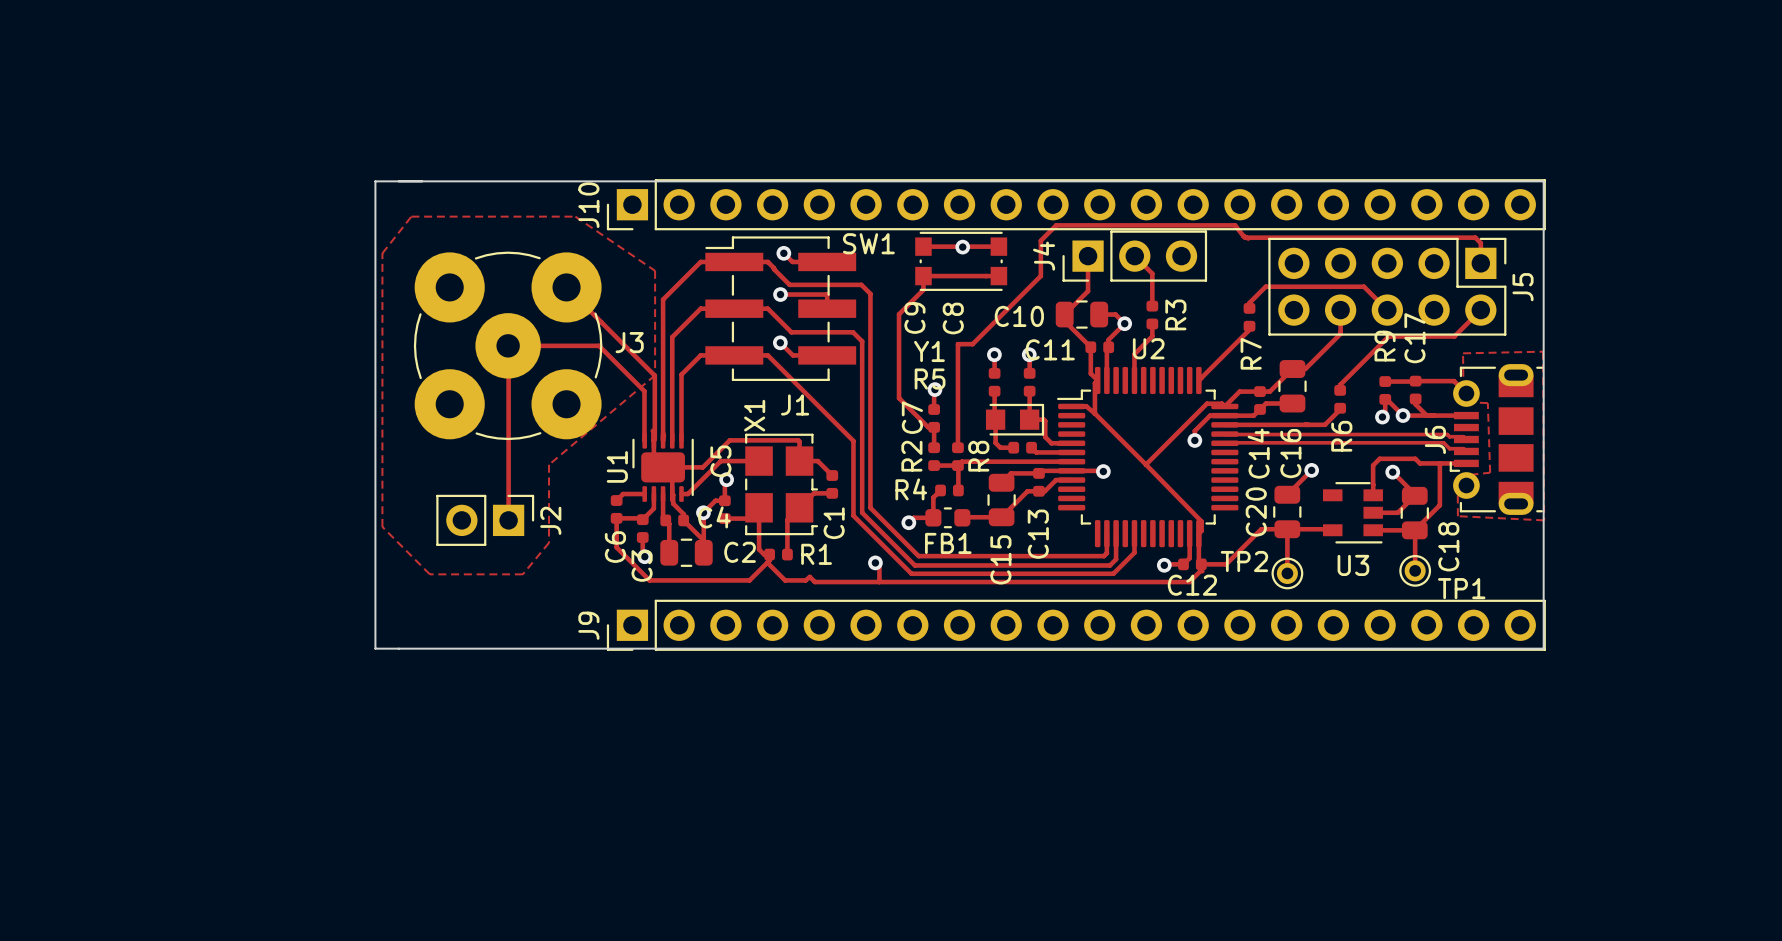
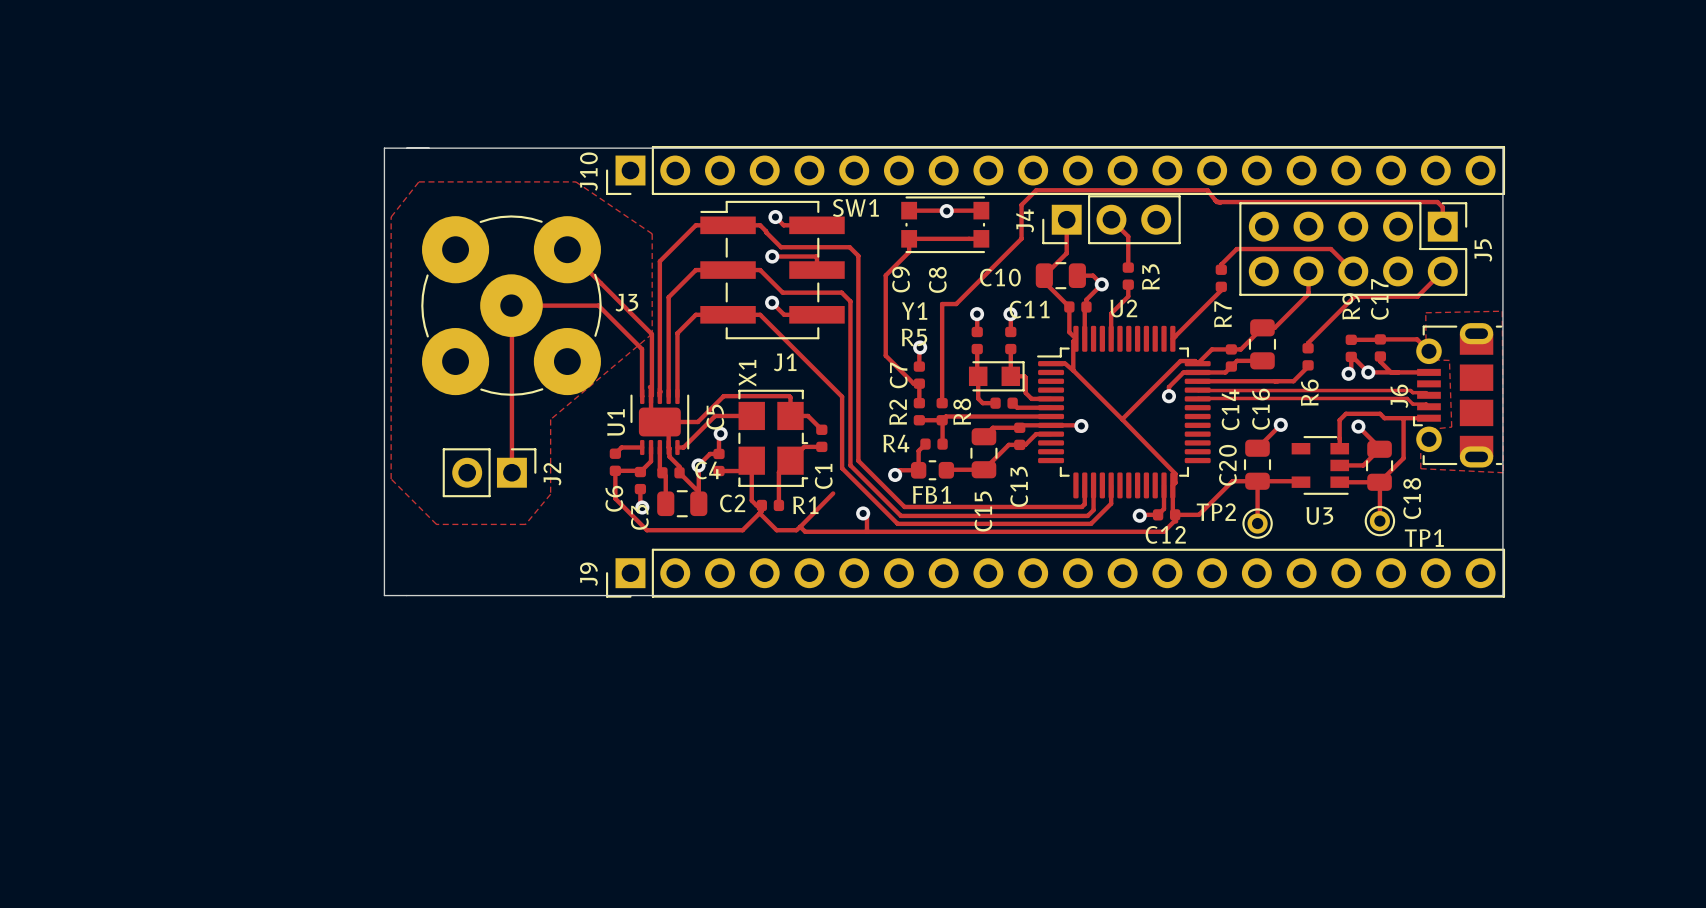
track: none -> (833, 493) (800, 526)

